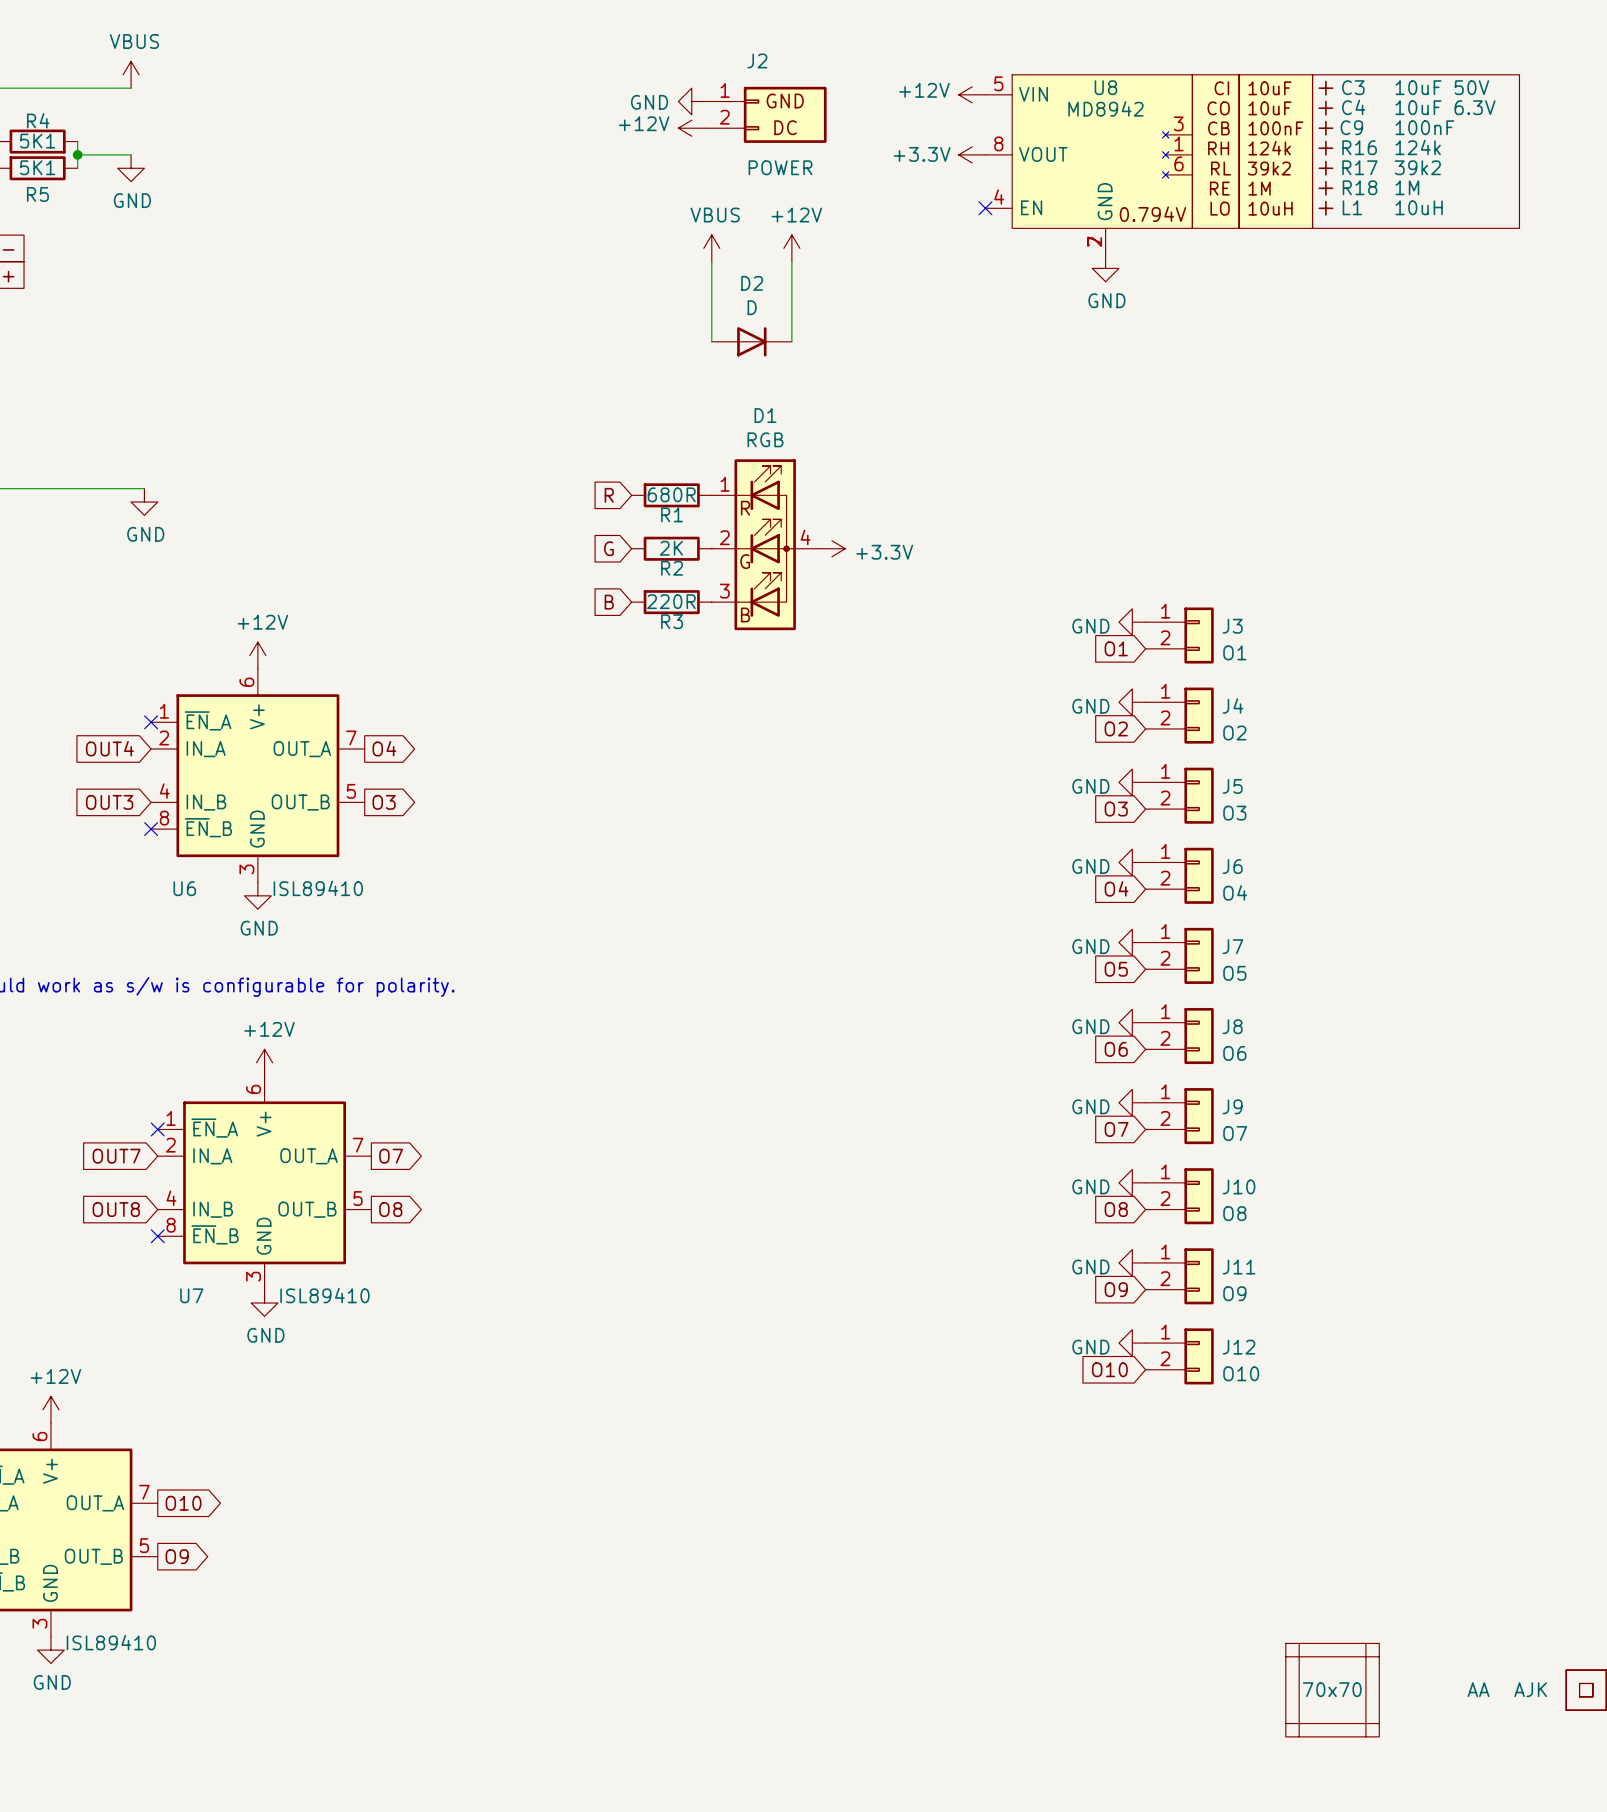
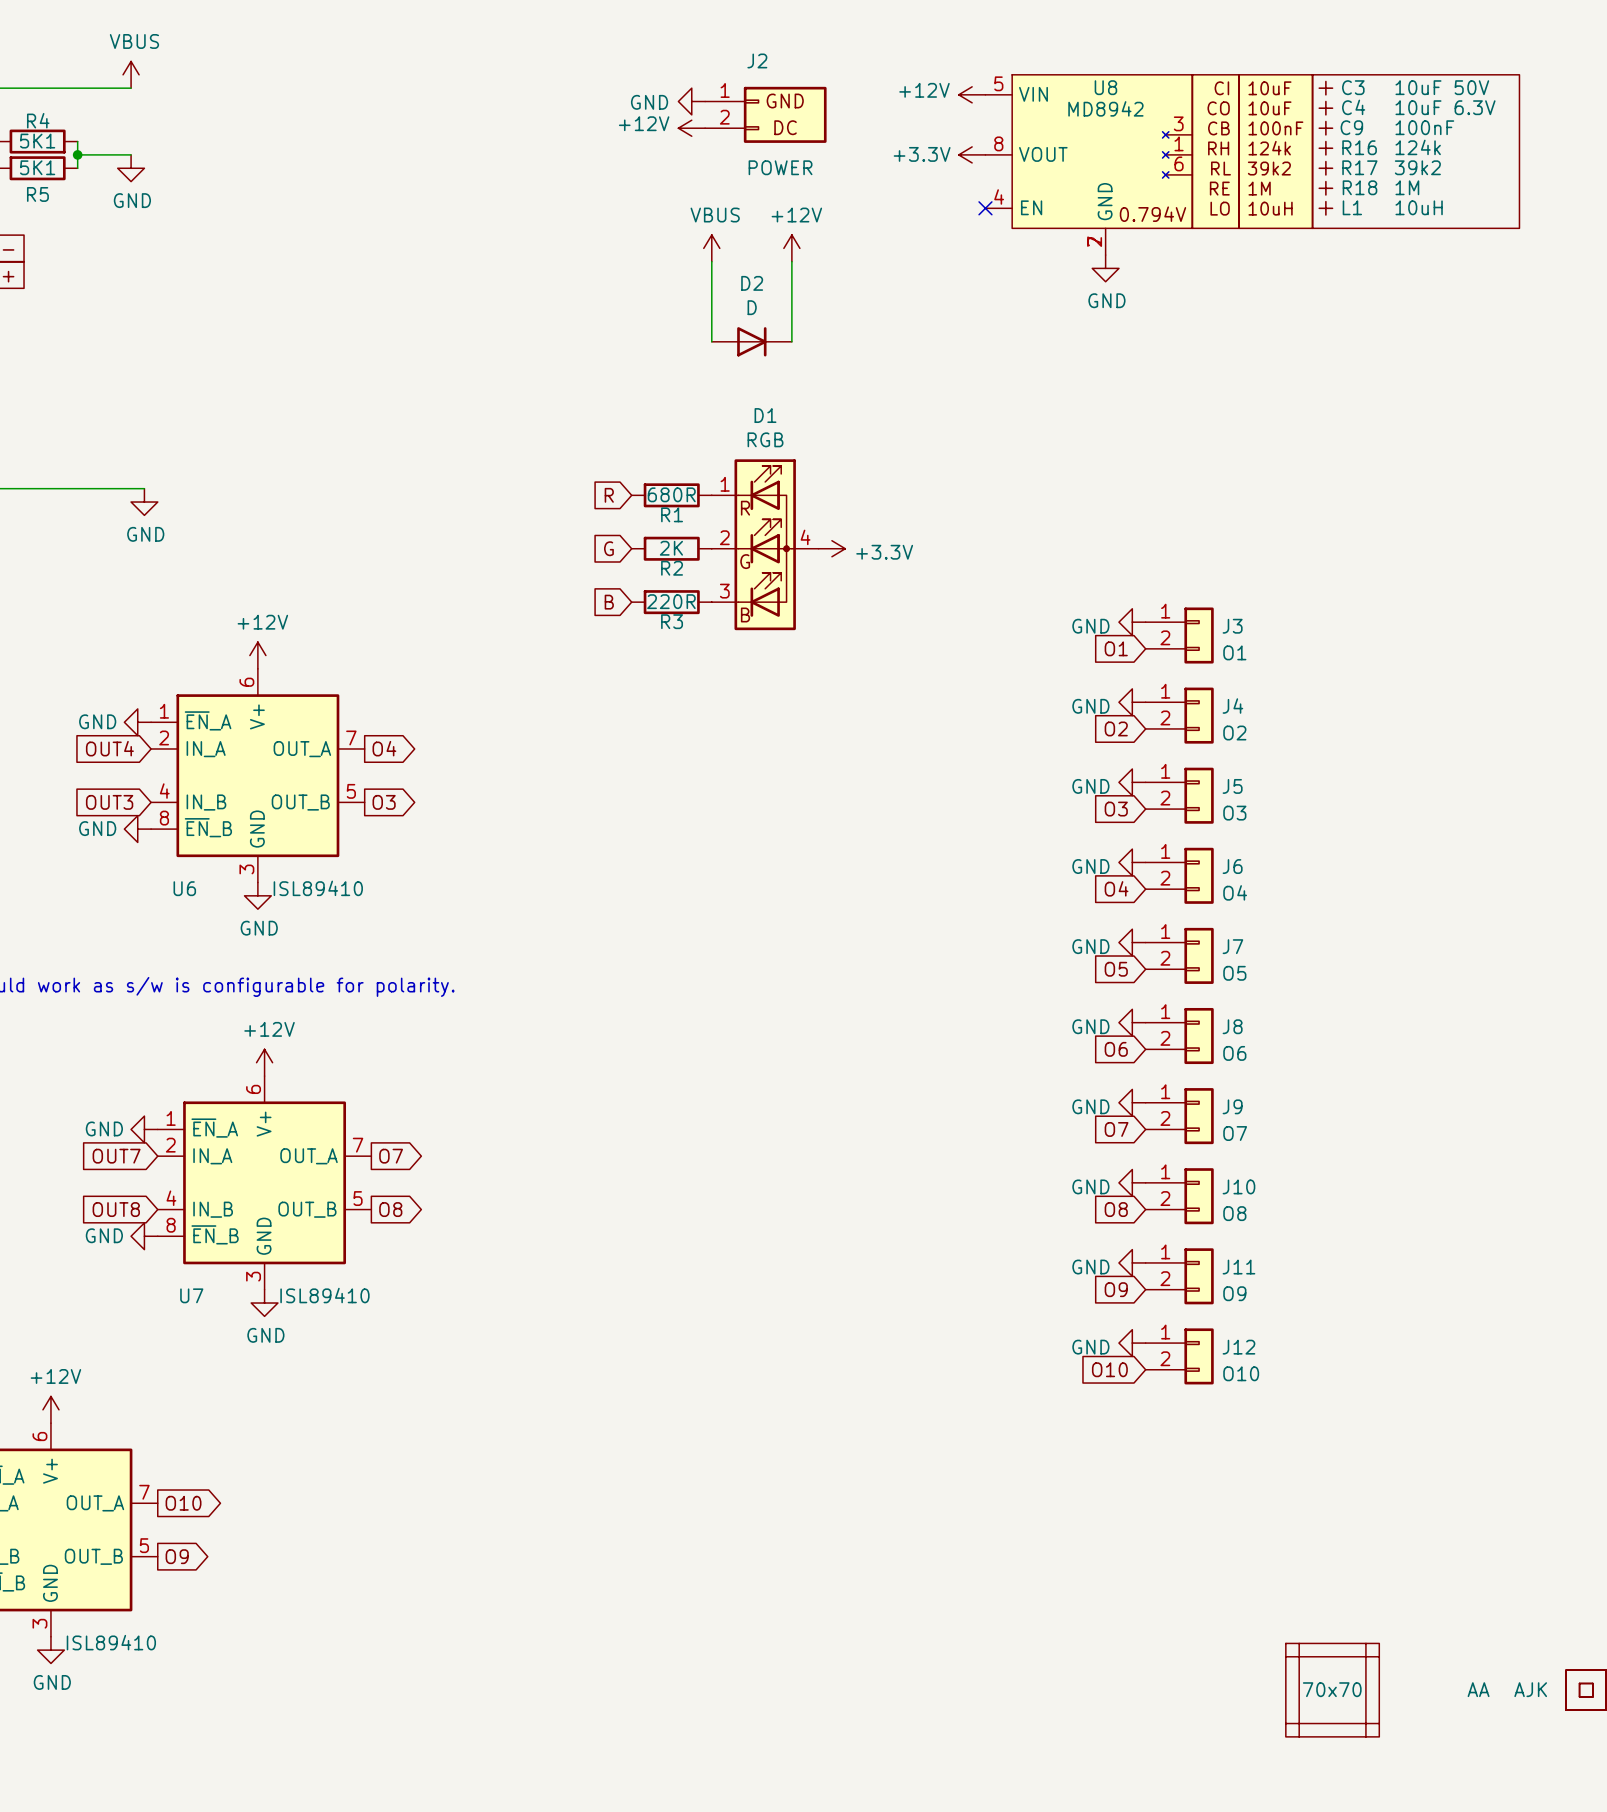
power symbol: none -> GND (137, 722)
no-connect mark: (151, 722) -> none
power symbol: none -> GND (137, 829)
no-connect mark: (151, 829) -> none
power symbol: none -> GND (144, 1129)
no-connect mark: (157, 1129) -> none
power symbol: none -> GND (144, 1236)
no-connect mark: (157, 1236) -> none

